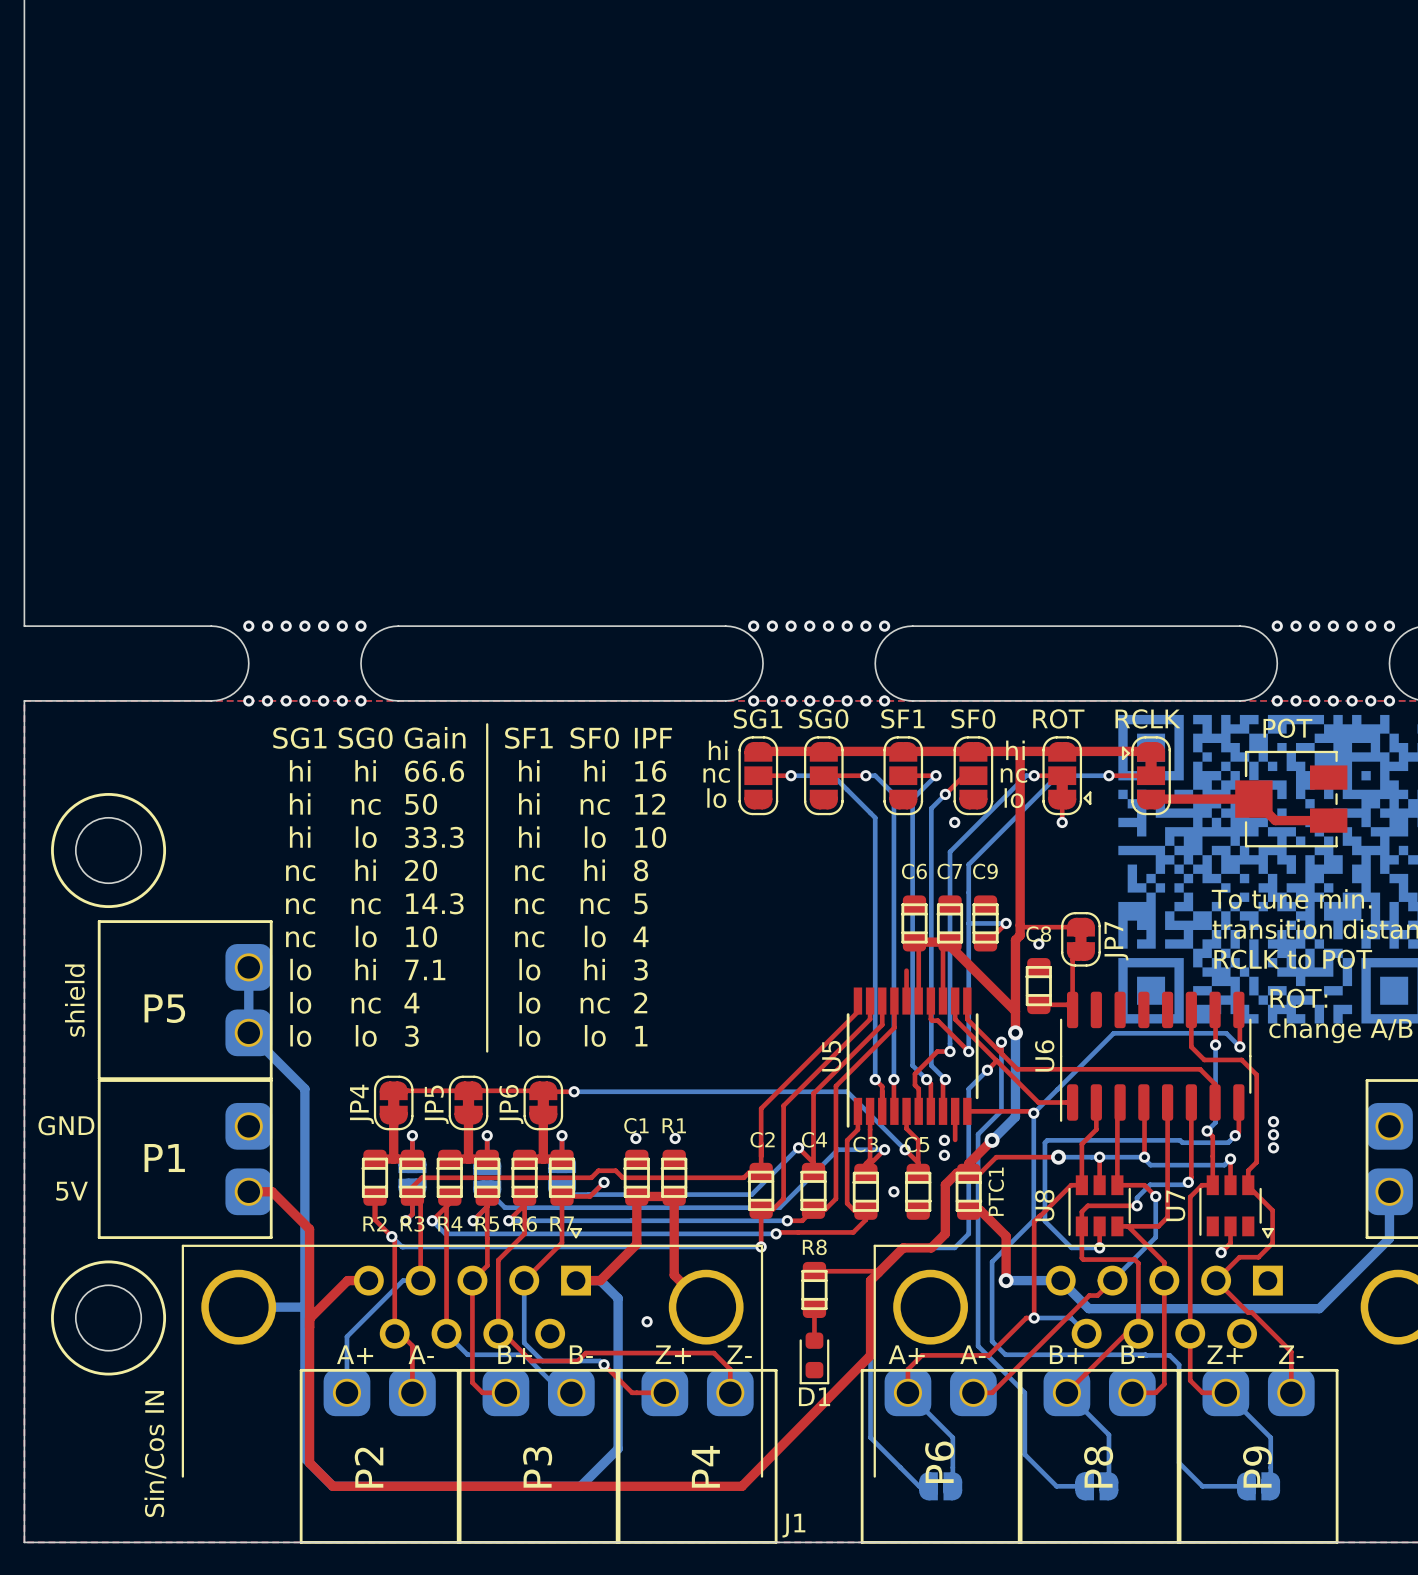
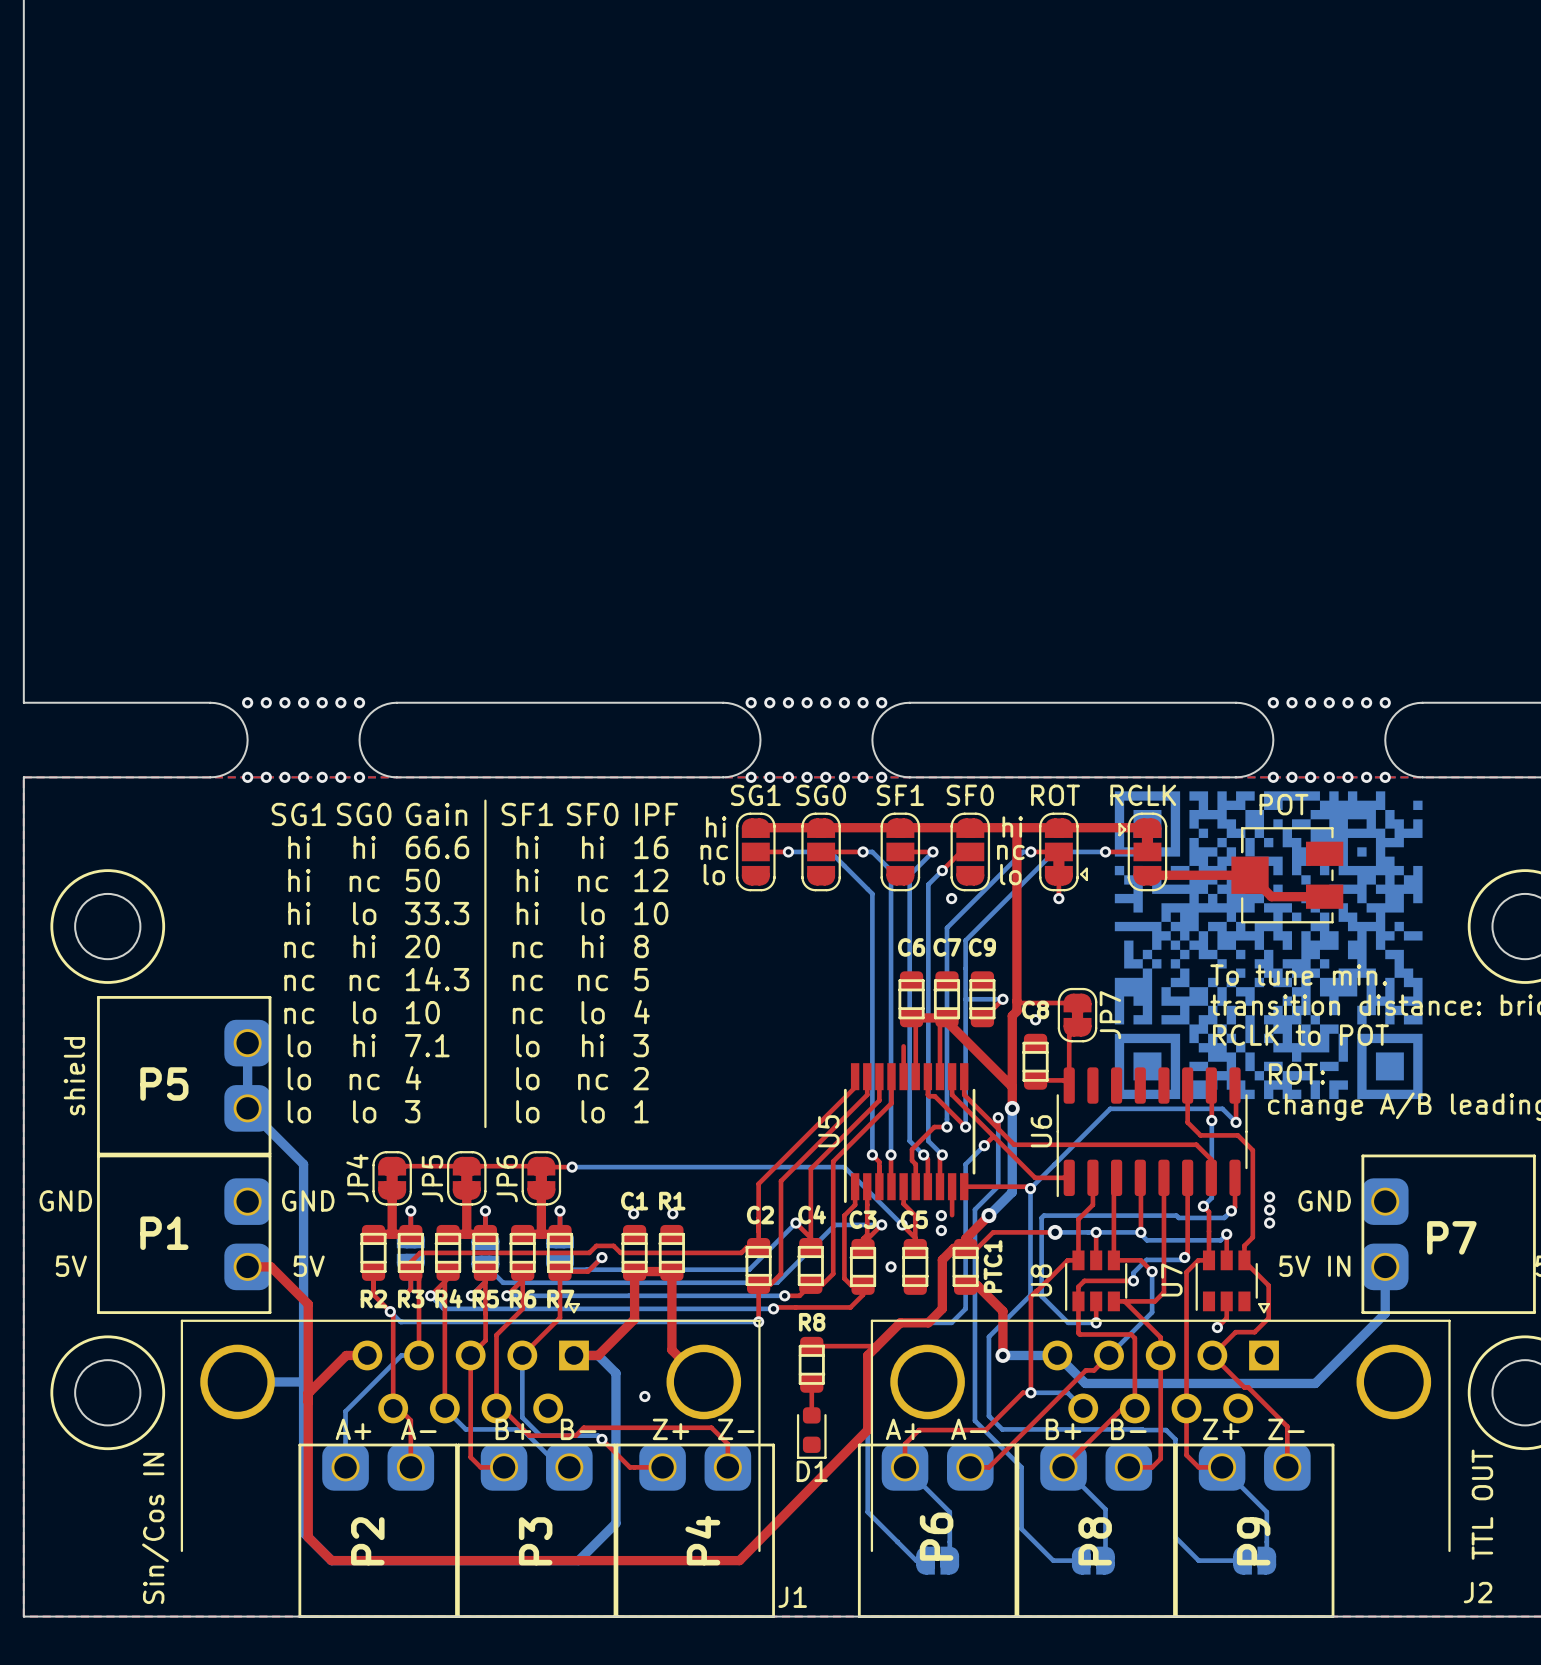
text: none -> GND (308, 1200)
text: none -> GND (1324, 1200)
text: none -> 5V (309, 1266)
text: none -> 5V IN (1314, 1266)

